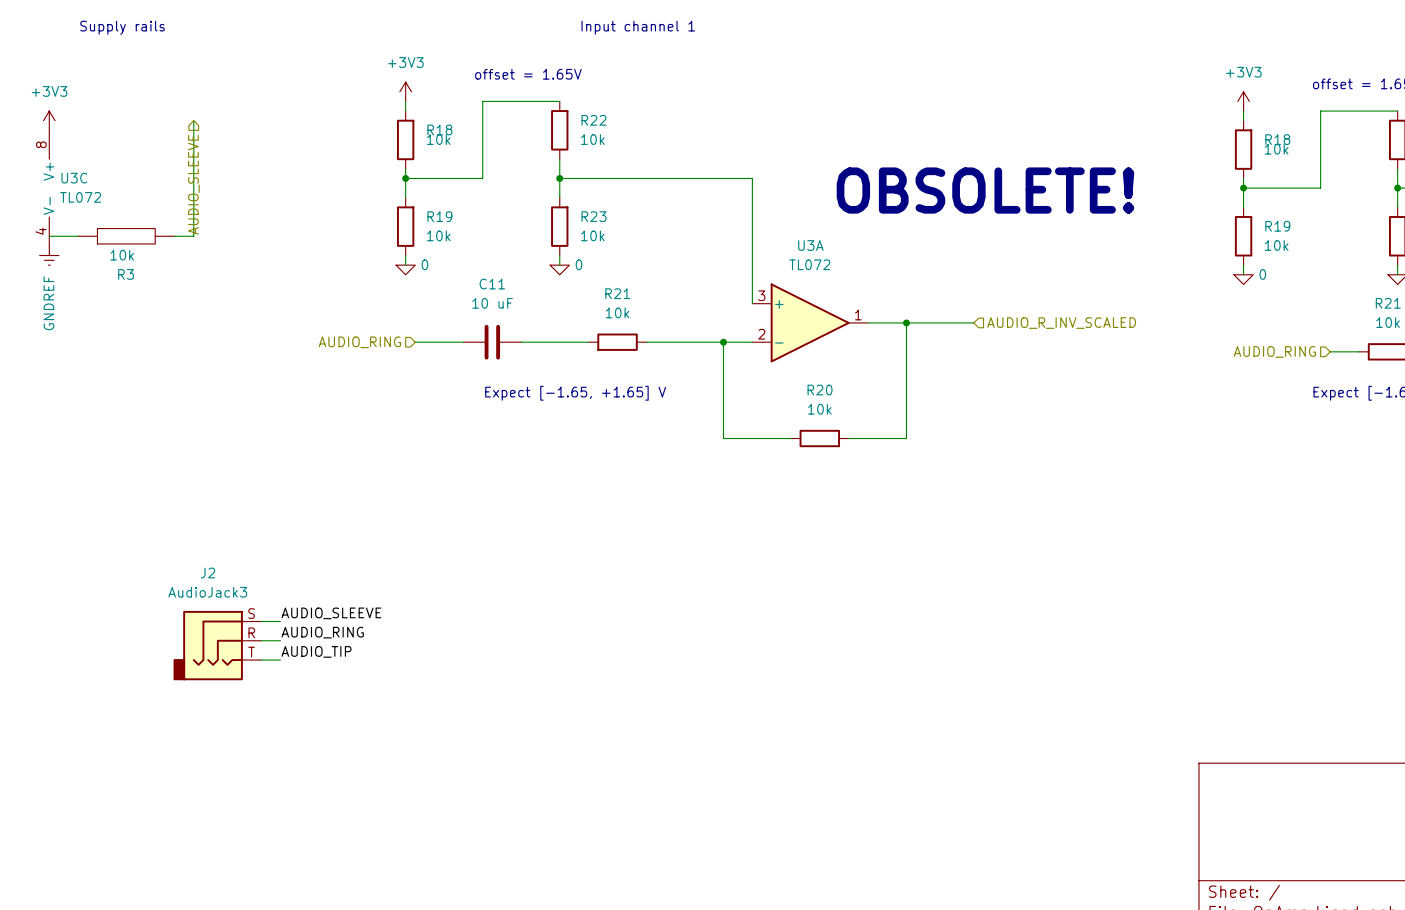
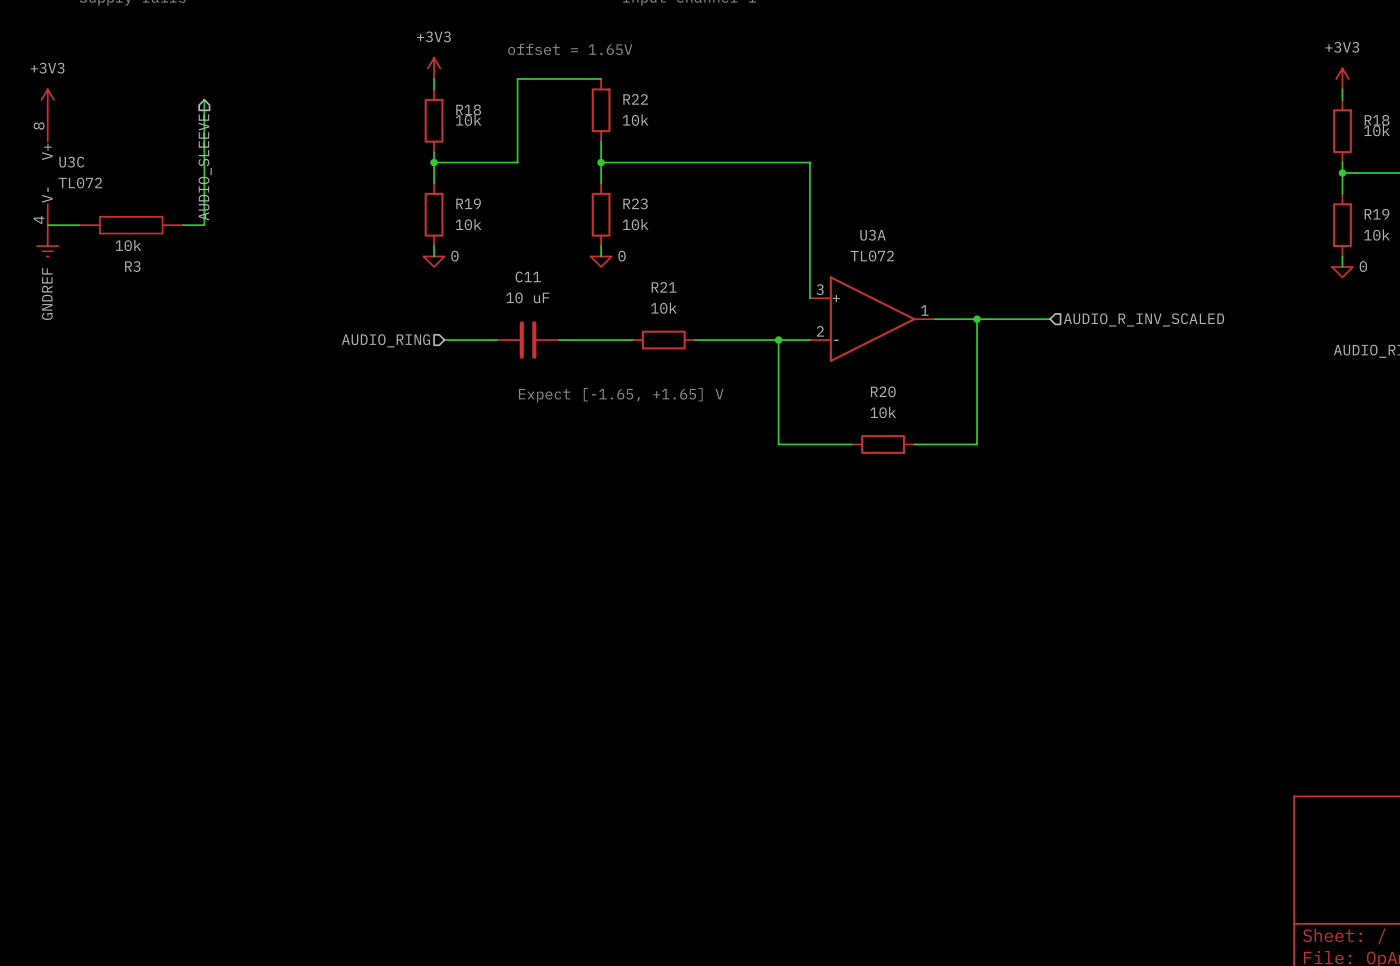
text: OBSOLETE! (985, 190) -> none
label: AUDIO_SLEEVE (331, 613) -> none
wire: (261, 621) (280, 621) -> none
label: AUDIO_RING (322, 632) -> none
wire: (261, 640) (280, 640) -> none
J2: AudioJack3 (217, 645) -> none
label: AUDIO_TIP (316, 651) -> none
wire: (261, 660) (280, 660) -> none

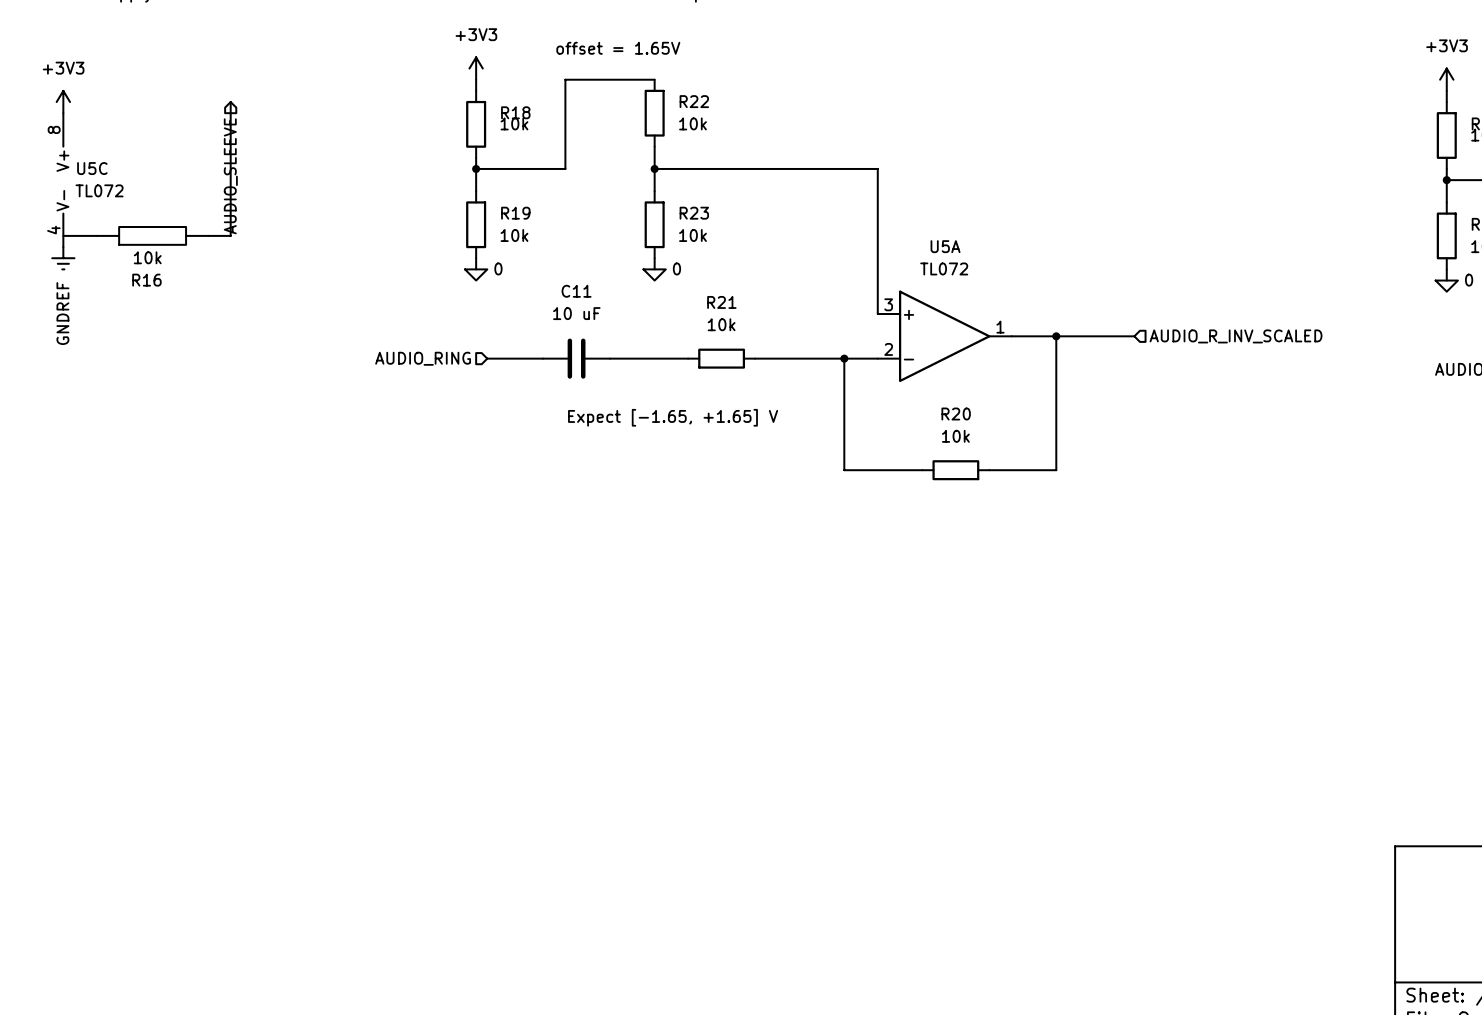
U3C name: U3C (71, 162) -> U5C (92, 168)
U3A name: U3A (872, 235) -> U5A (945, 246)
R3 name: R3 (132, 266) -> R16 (146, 280)

